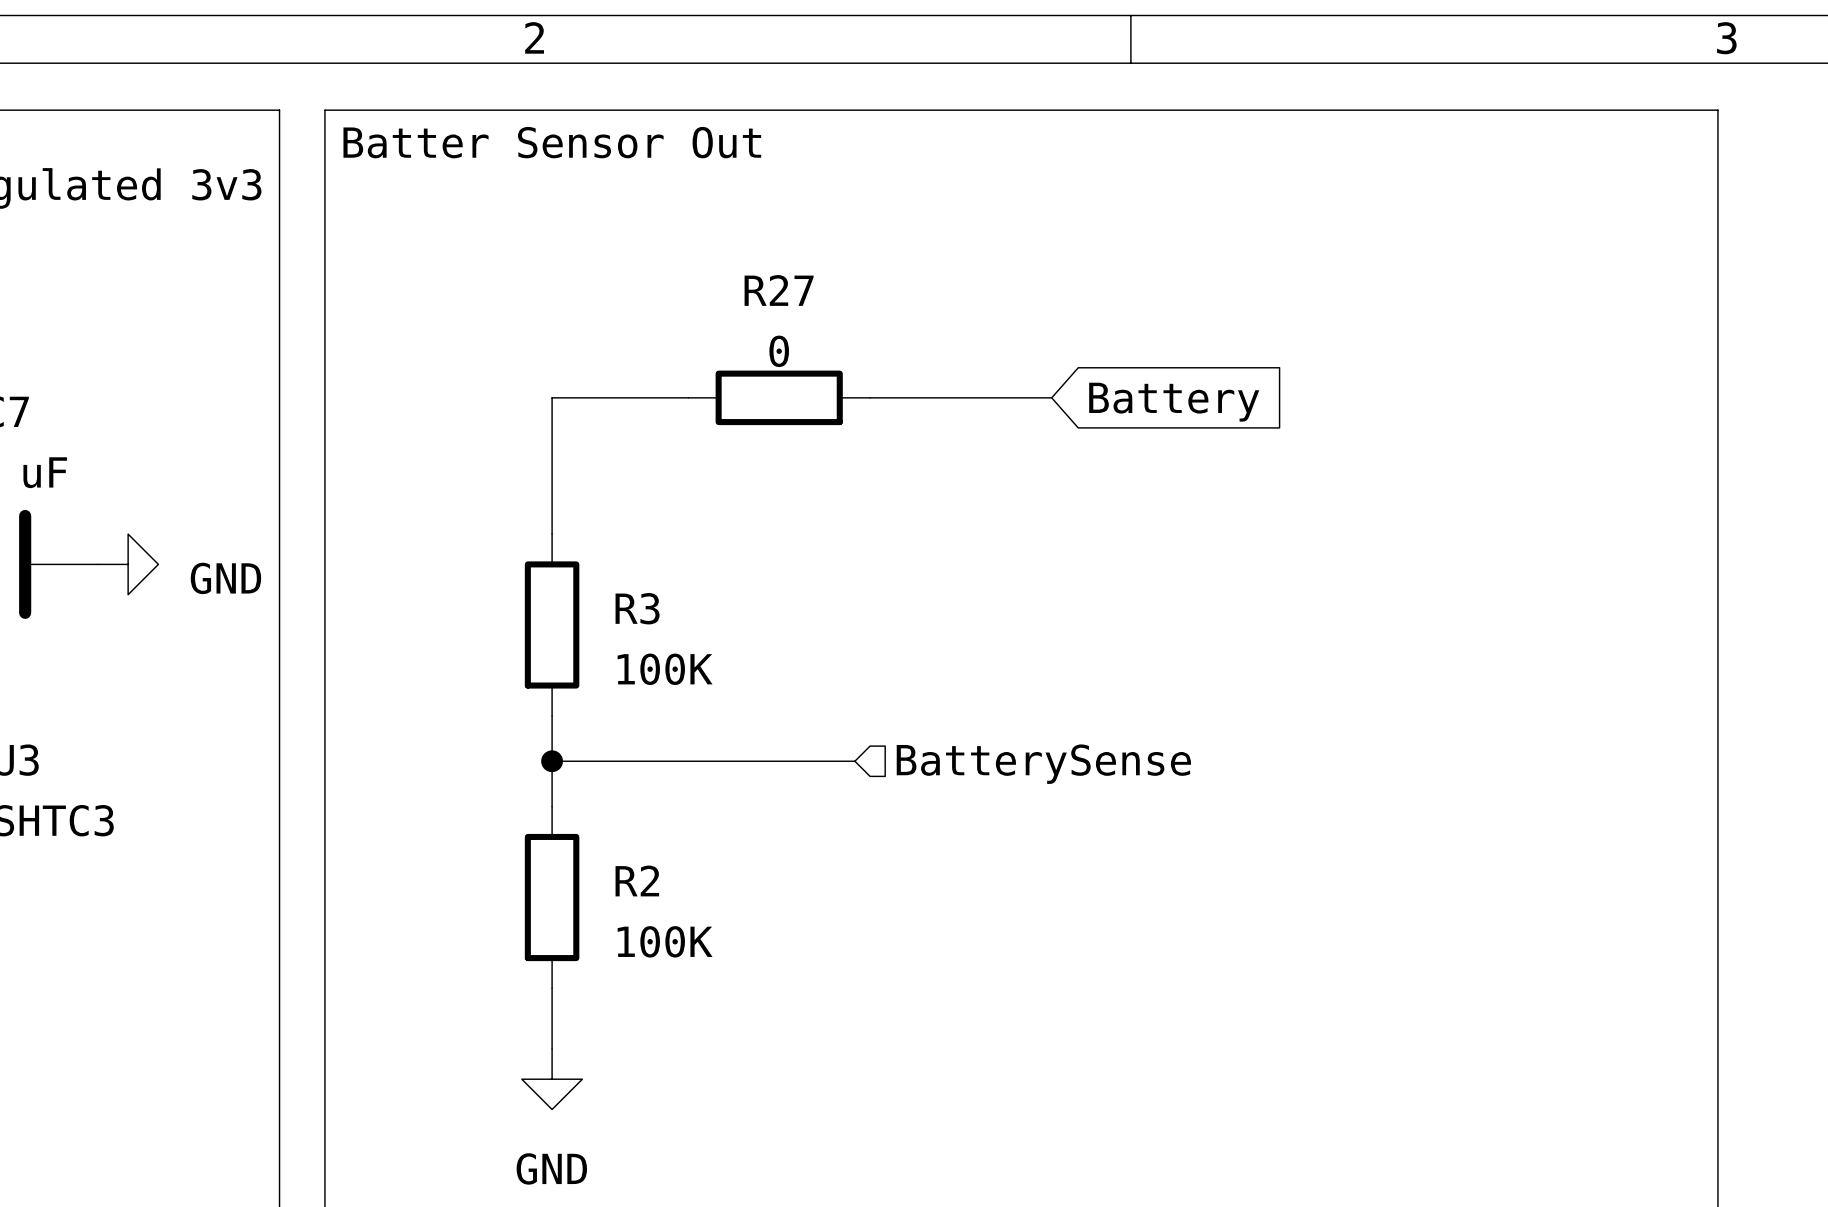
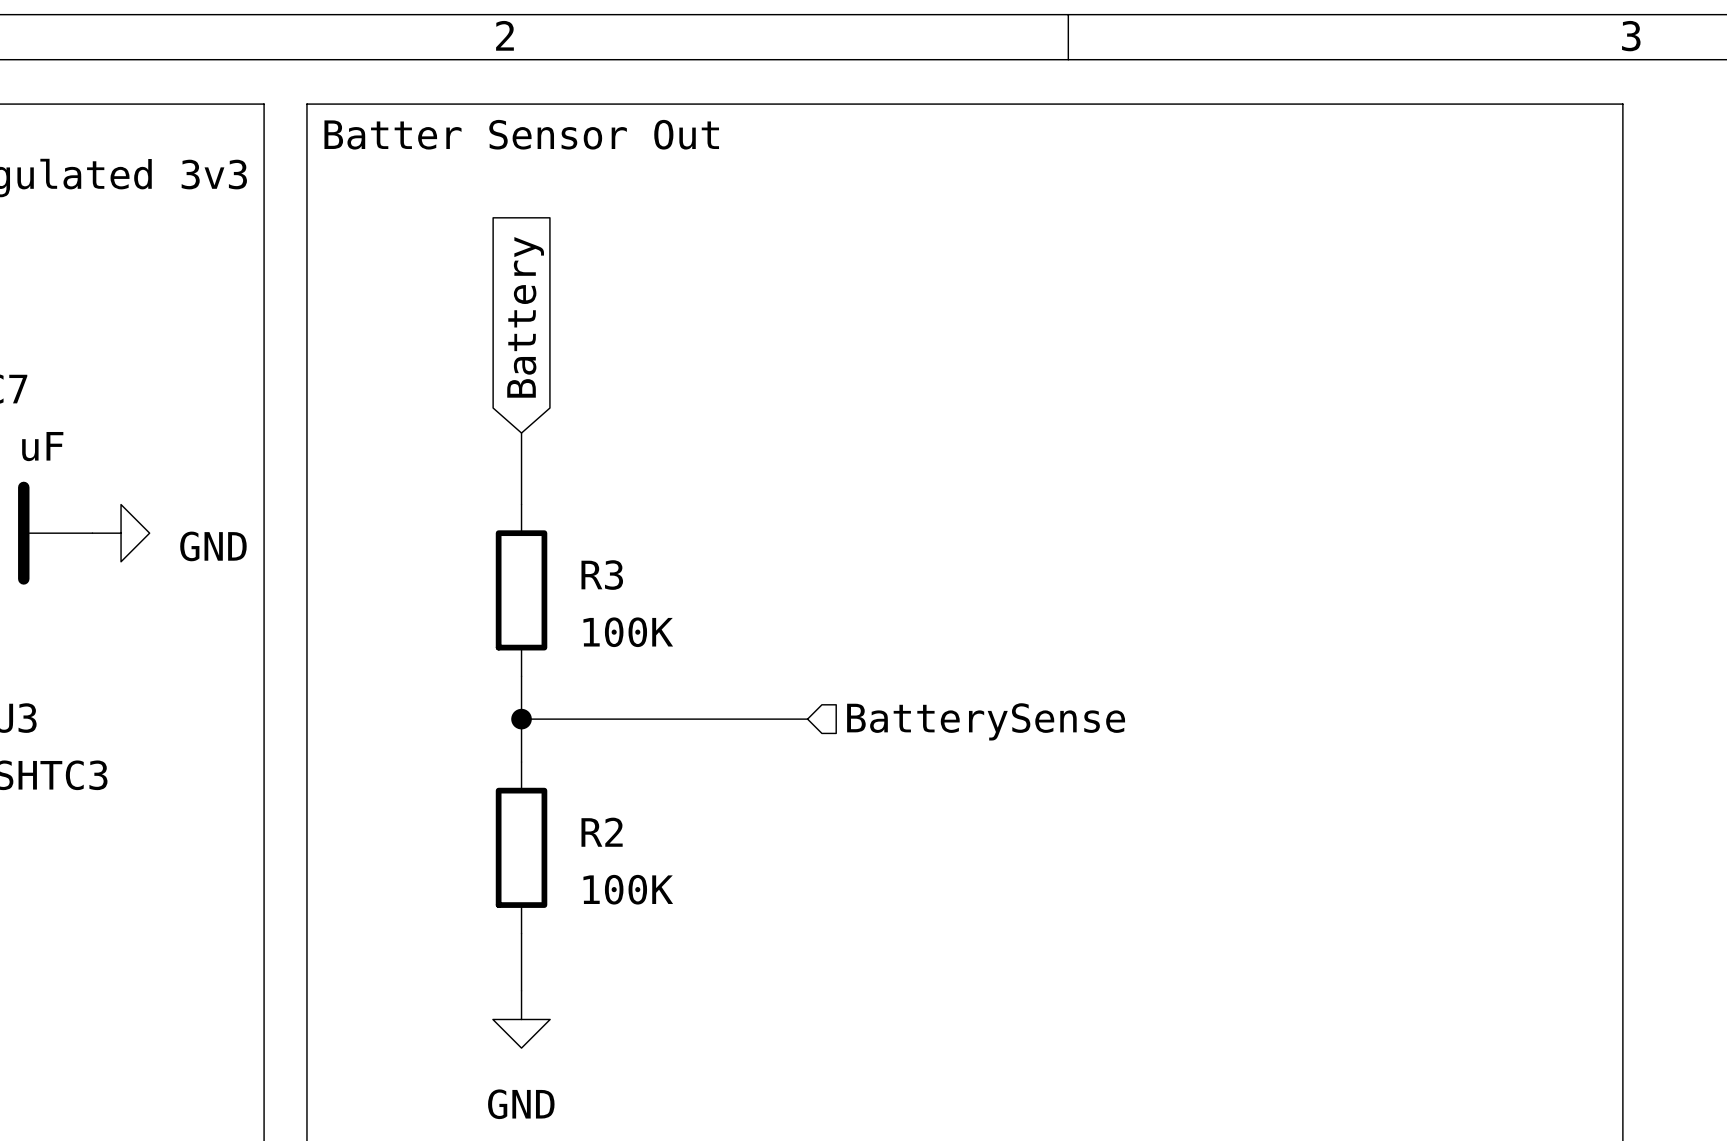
wire: (688, 397) (552, 397) (552, 458) -> none
R27: 0 (779, 397) -> none
wire: (870, 397) (1051, 397) -> none
global label rotation: 0° (1174, 402) -> 90° counterclockwise (525, 317)
global label position: Battery (1174, 402) -> Battery (525, 317)

